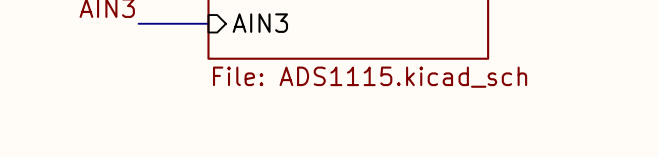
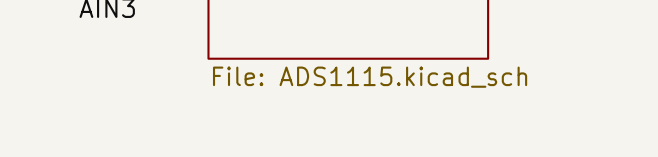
wire: (138, 23) (208, 23) -> none
sheet pin: AIN3 (260, 23) -> none

